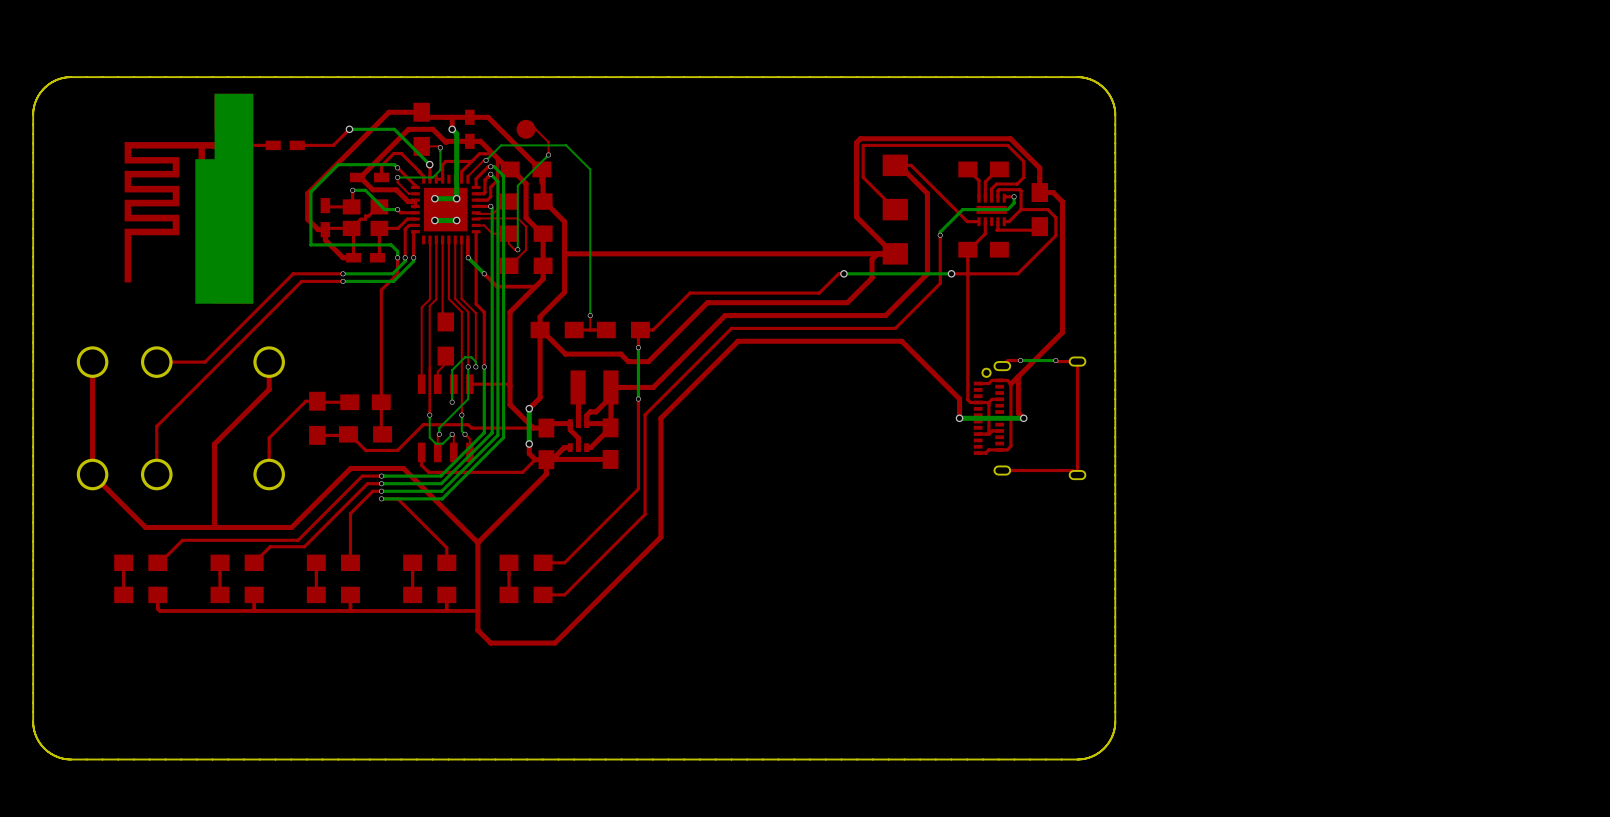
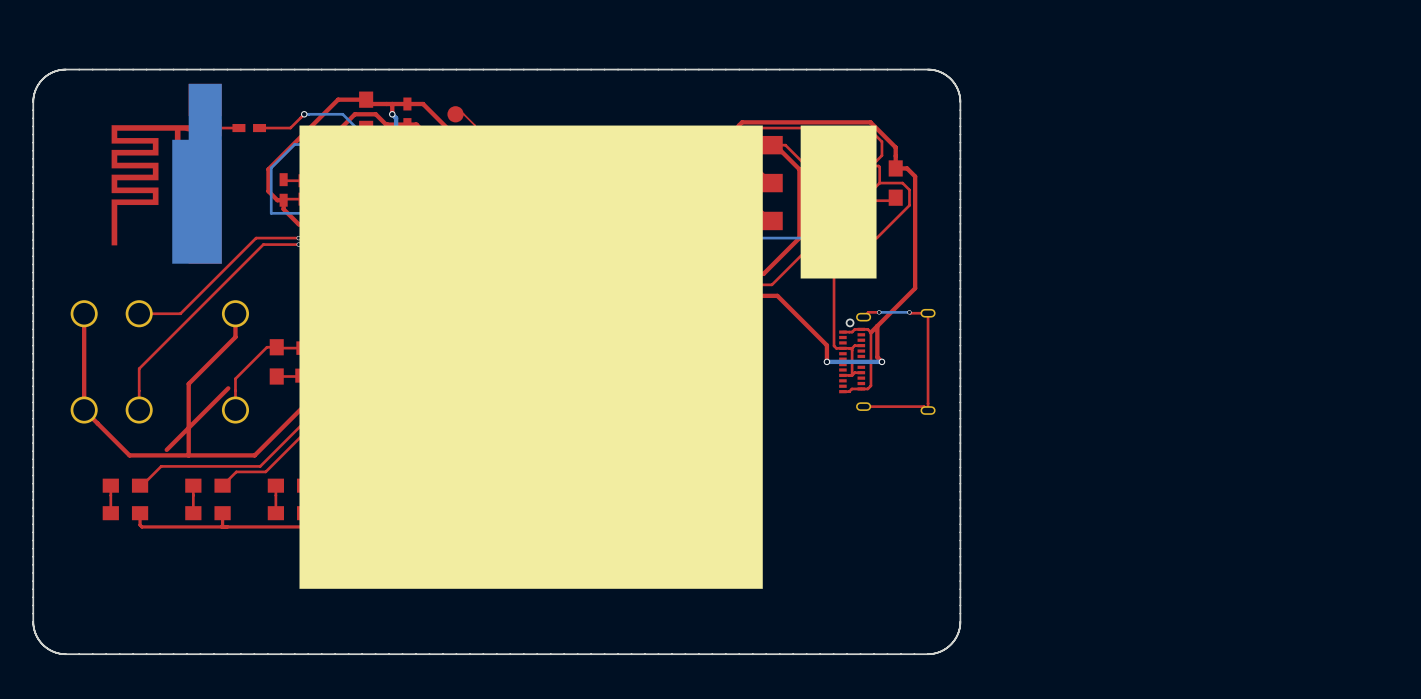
drawing: none -> [299, 125, 877, 589]
top track: (725, 315) (653, 387) -> none
top track: none -> (228, 388) (166, 449)

